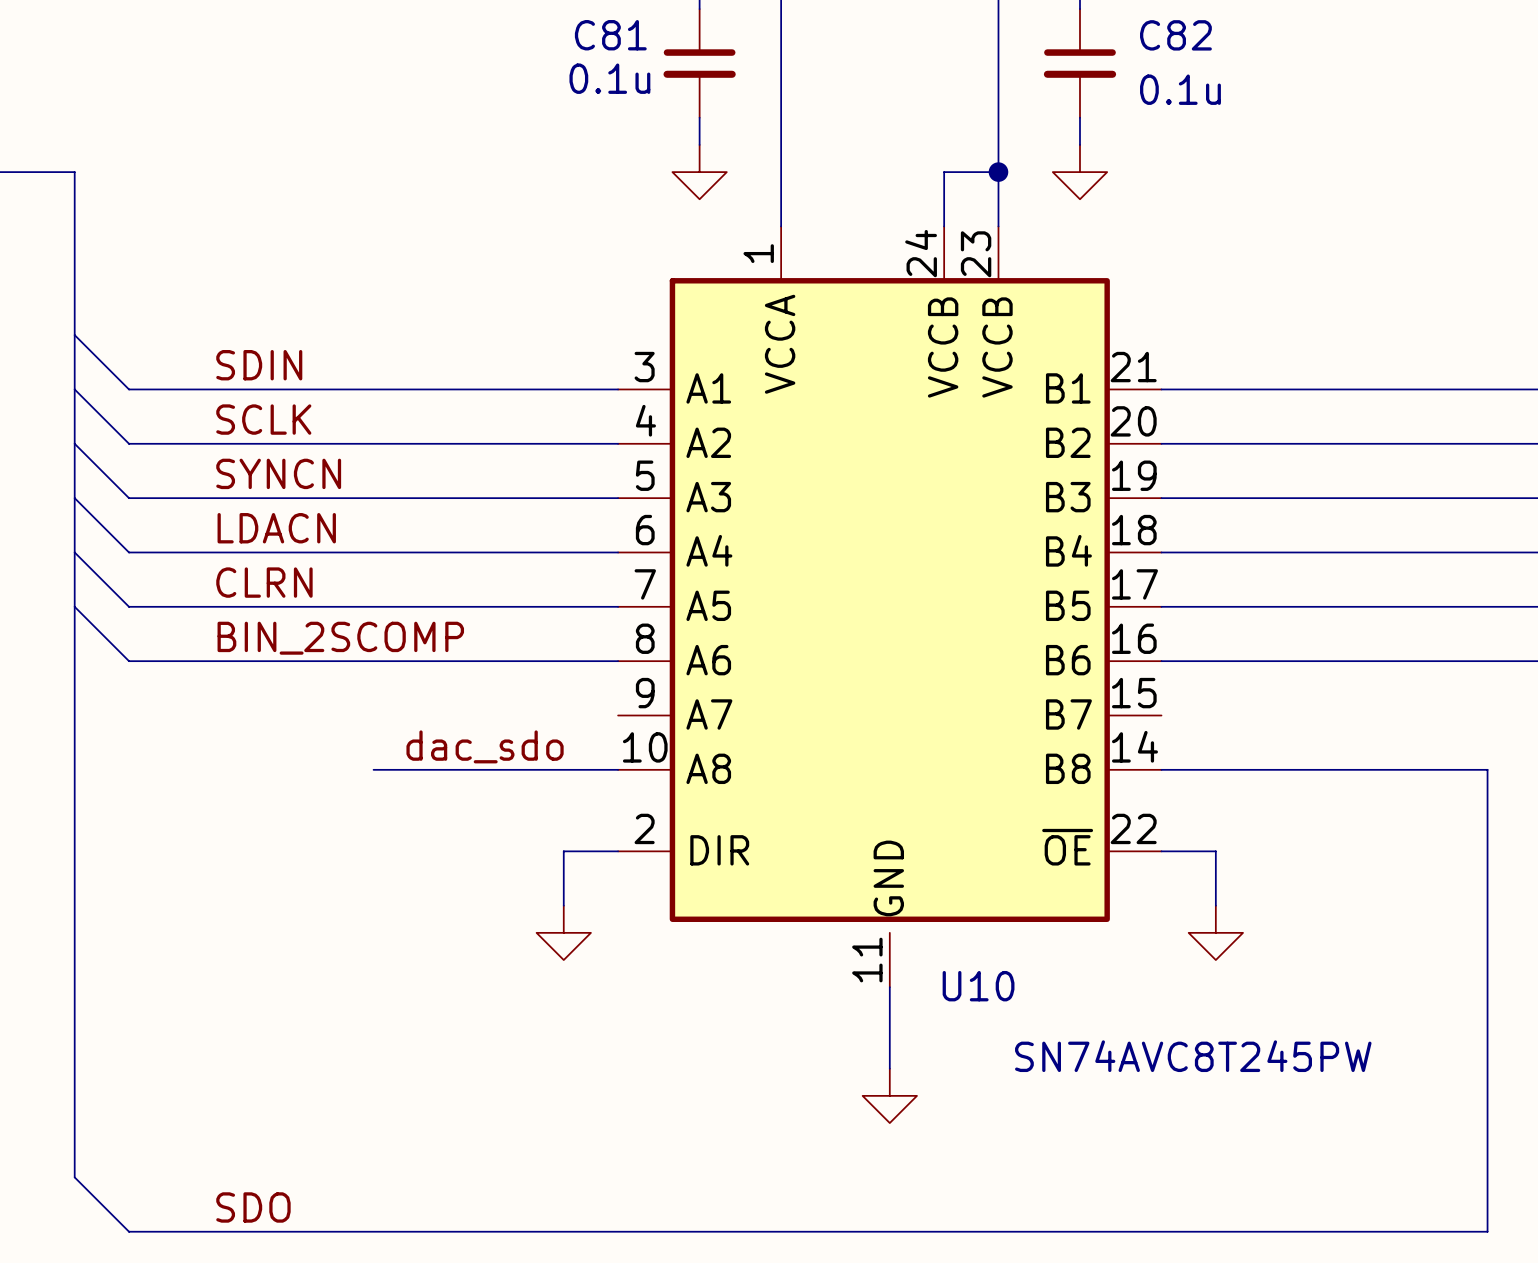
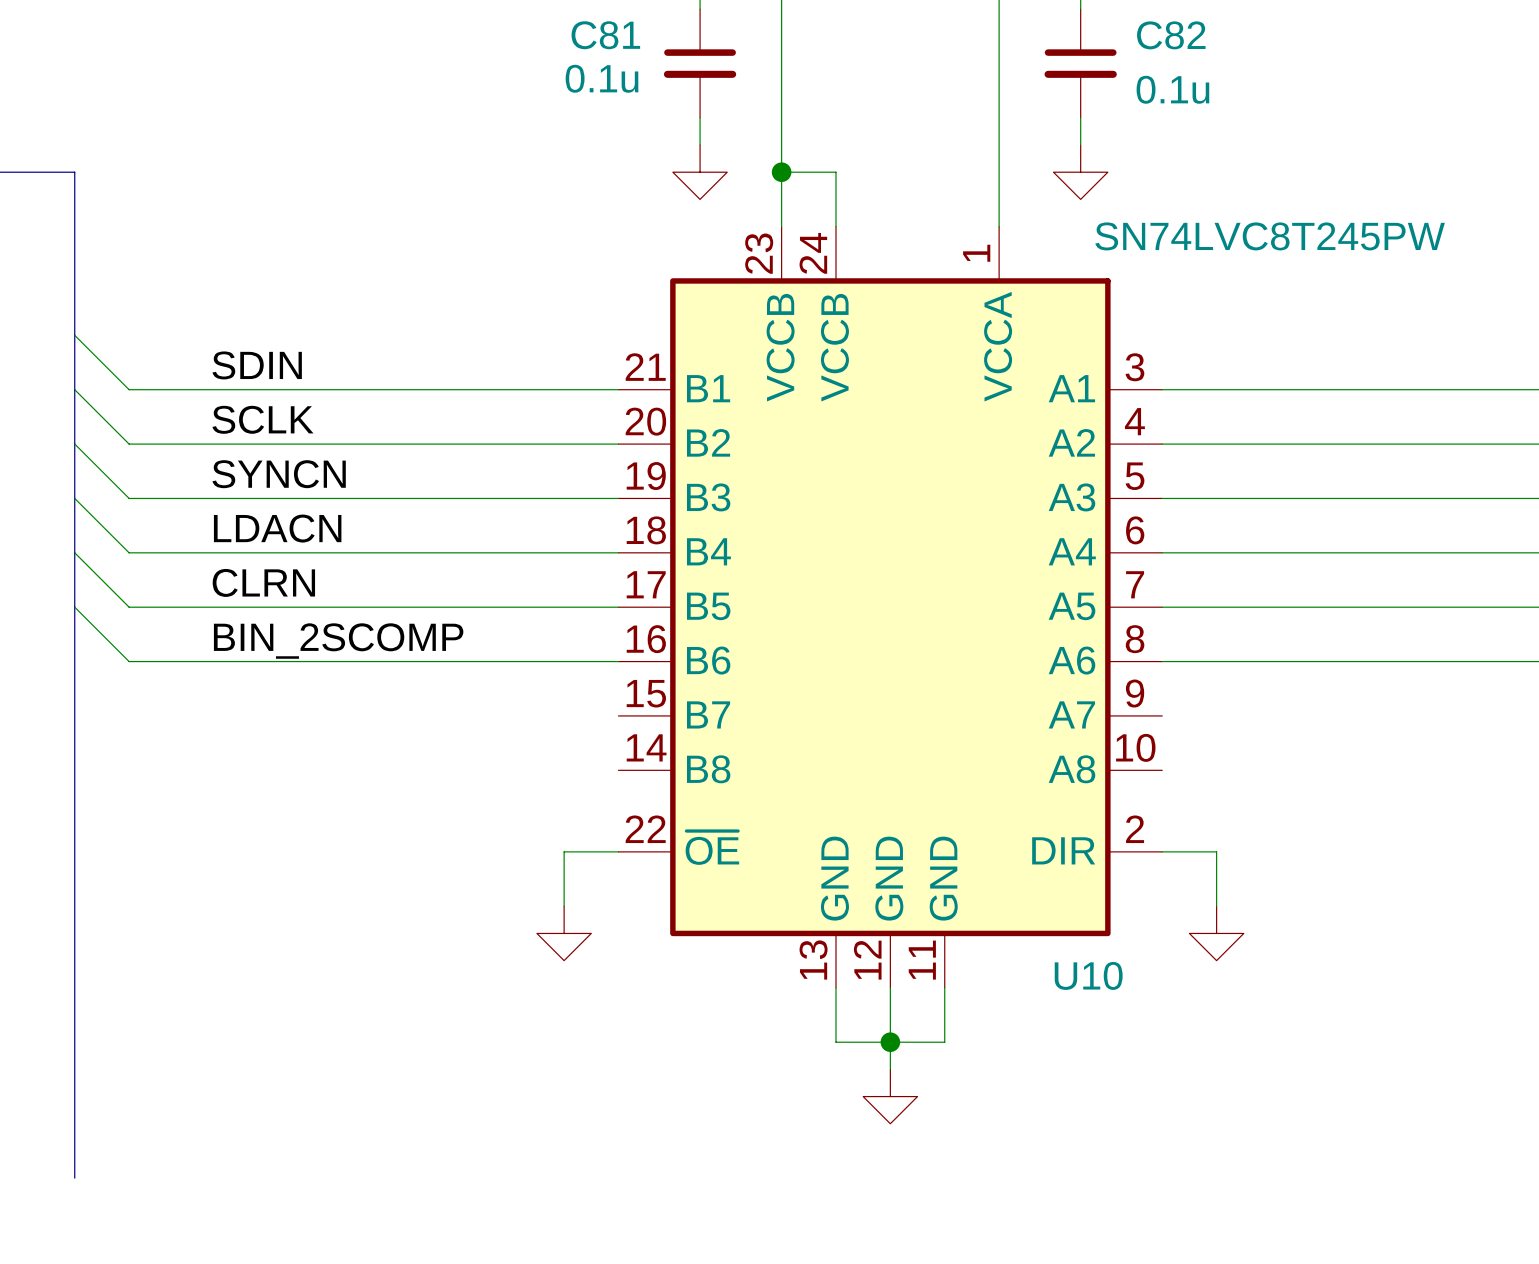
wire: none -> (781, 172) (835, 172) (835, 226)
junction: none -> (781, 172)
wire: (998, 172) (944, 172) (944, 226) -> none
junction: (998, 172) -> none
U10 symbol: [618, 226, 1162, 988] -> [618, 226, 1163, 988]
label: dac_sdo (485, 746) -> none
wire: (373, 769) (618, 769) -> none
wire: (1161, 769) (1487, 769) (1487, 1231) (129, 1231) (74, 1177) -> none
U10 name position: U10 (978, 986) -> U10 (1088, 975)
wire: none -> (835, 987) (835, 1042) (944, 1042) (944, 987)
junction: none -> (890, 1042)
U10 value: SN74AVC8T245PW (1193, 1056) -> SN74LVC8T245PW (1270, 236)
label: SDO (253, 1207) -> none

